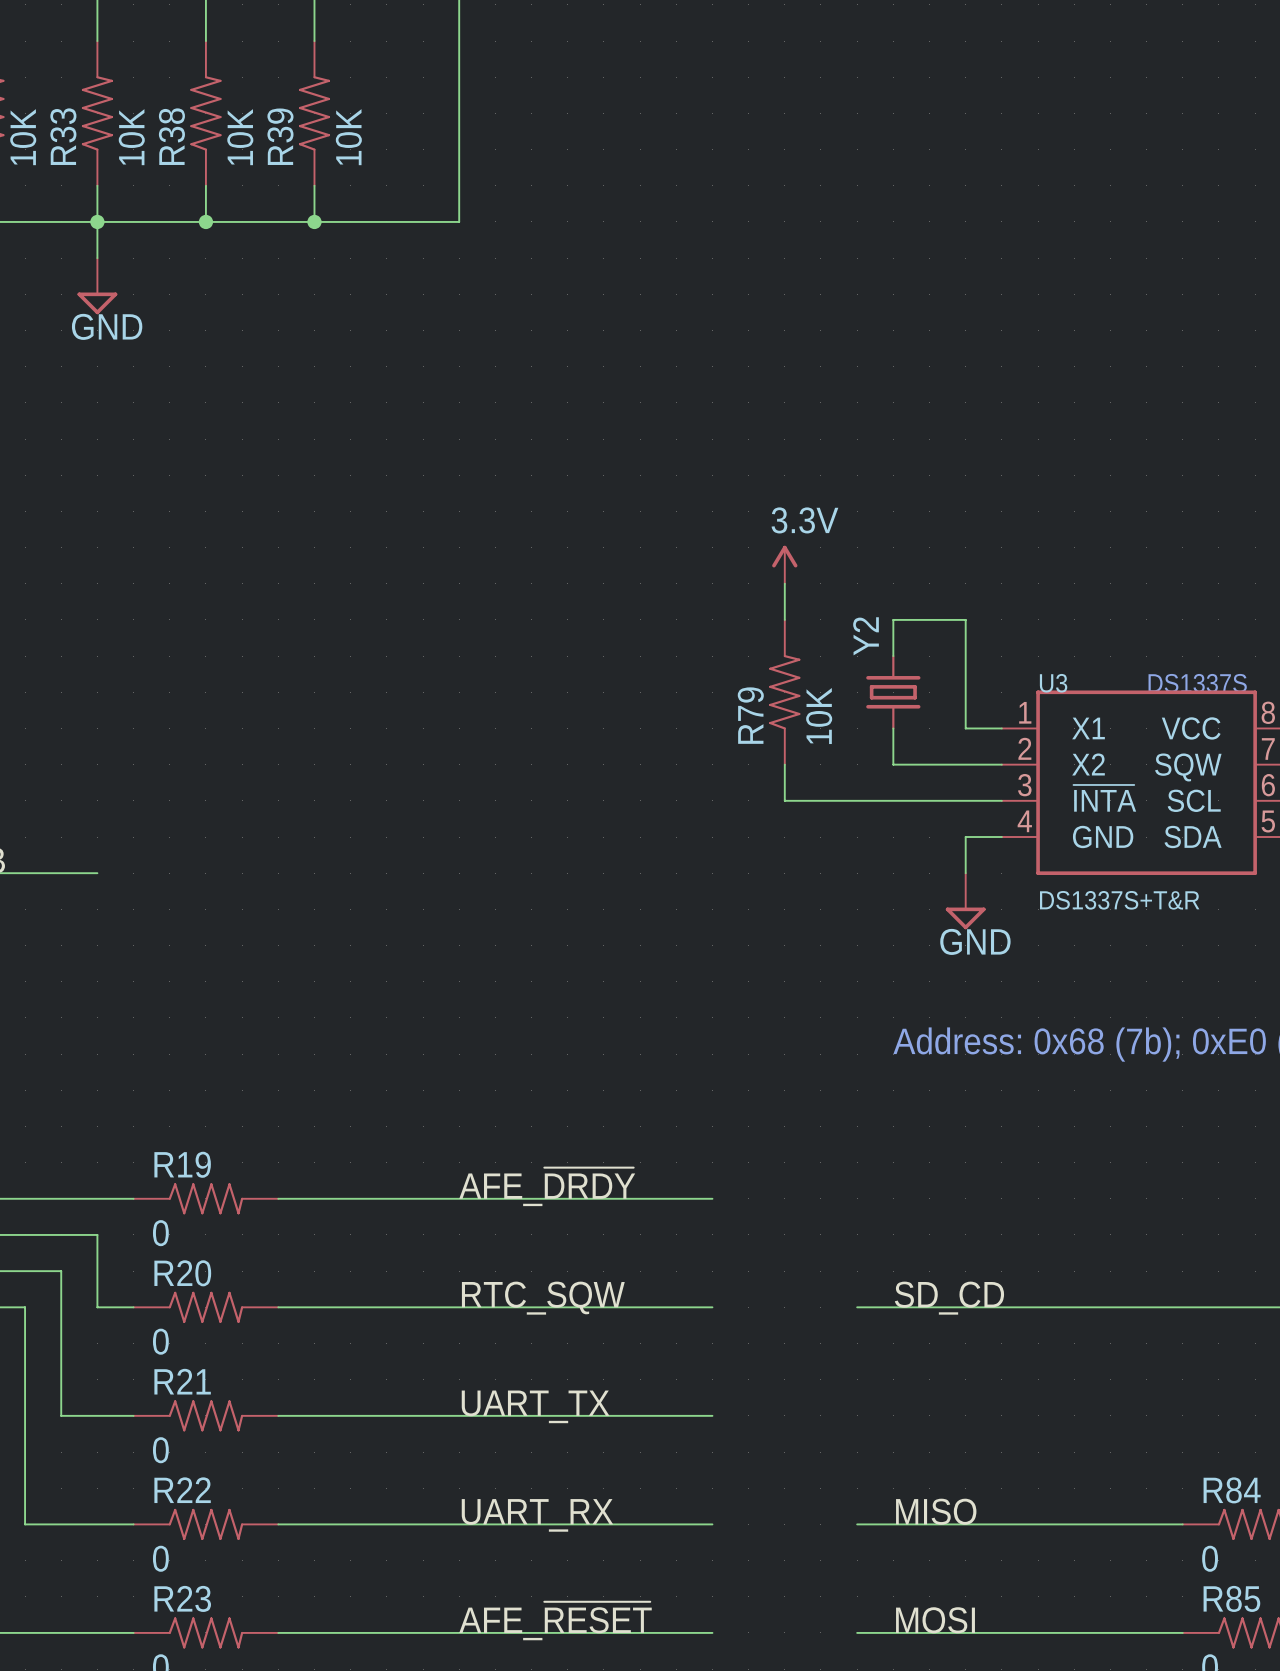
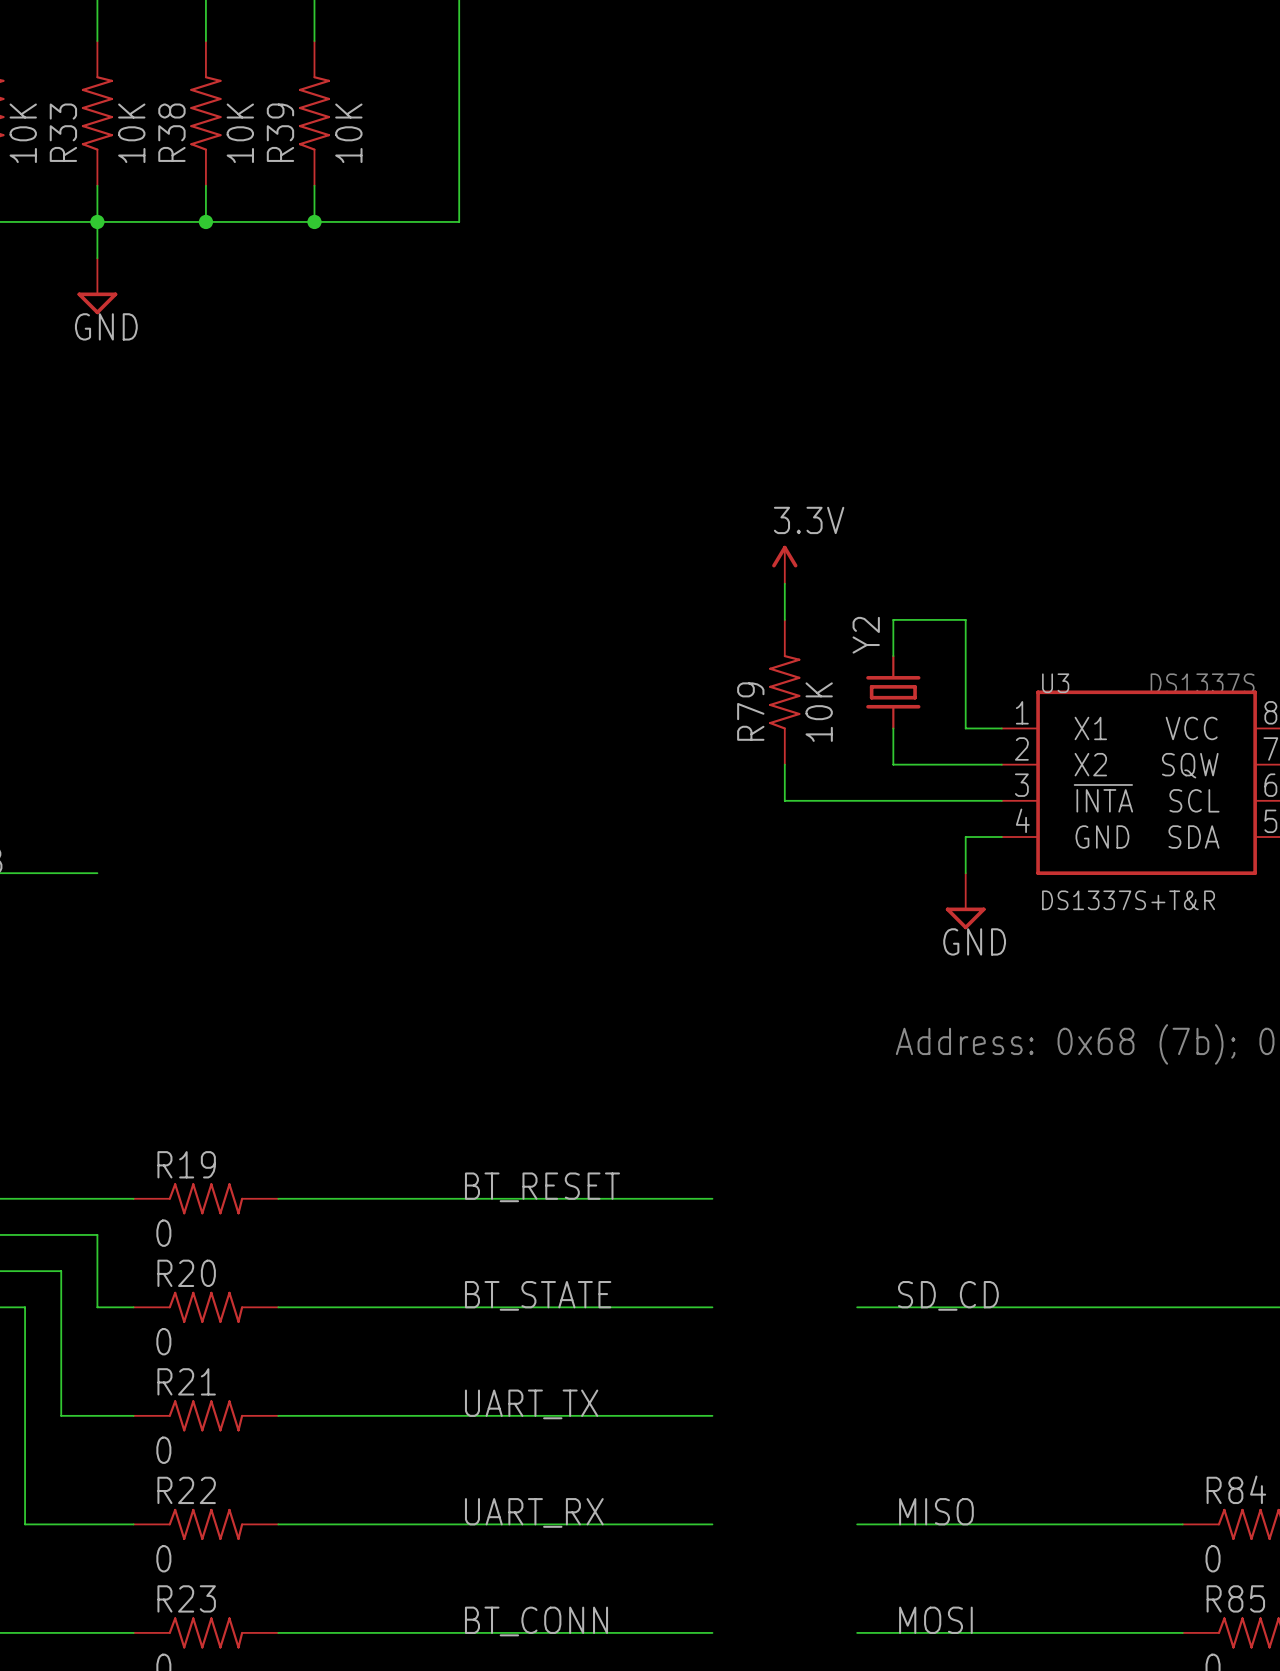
label: AFE_~{DRDY} (547, 1186) -> BT_RESET (542, 1187)
label: RTC_SQW (543, 1298) -> BT_STATE (538, 1295)
label: AFE_~{RESET} (555, 1621) -> BT_CONN (536, 1621)

